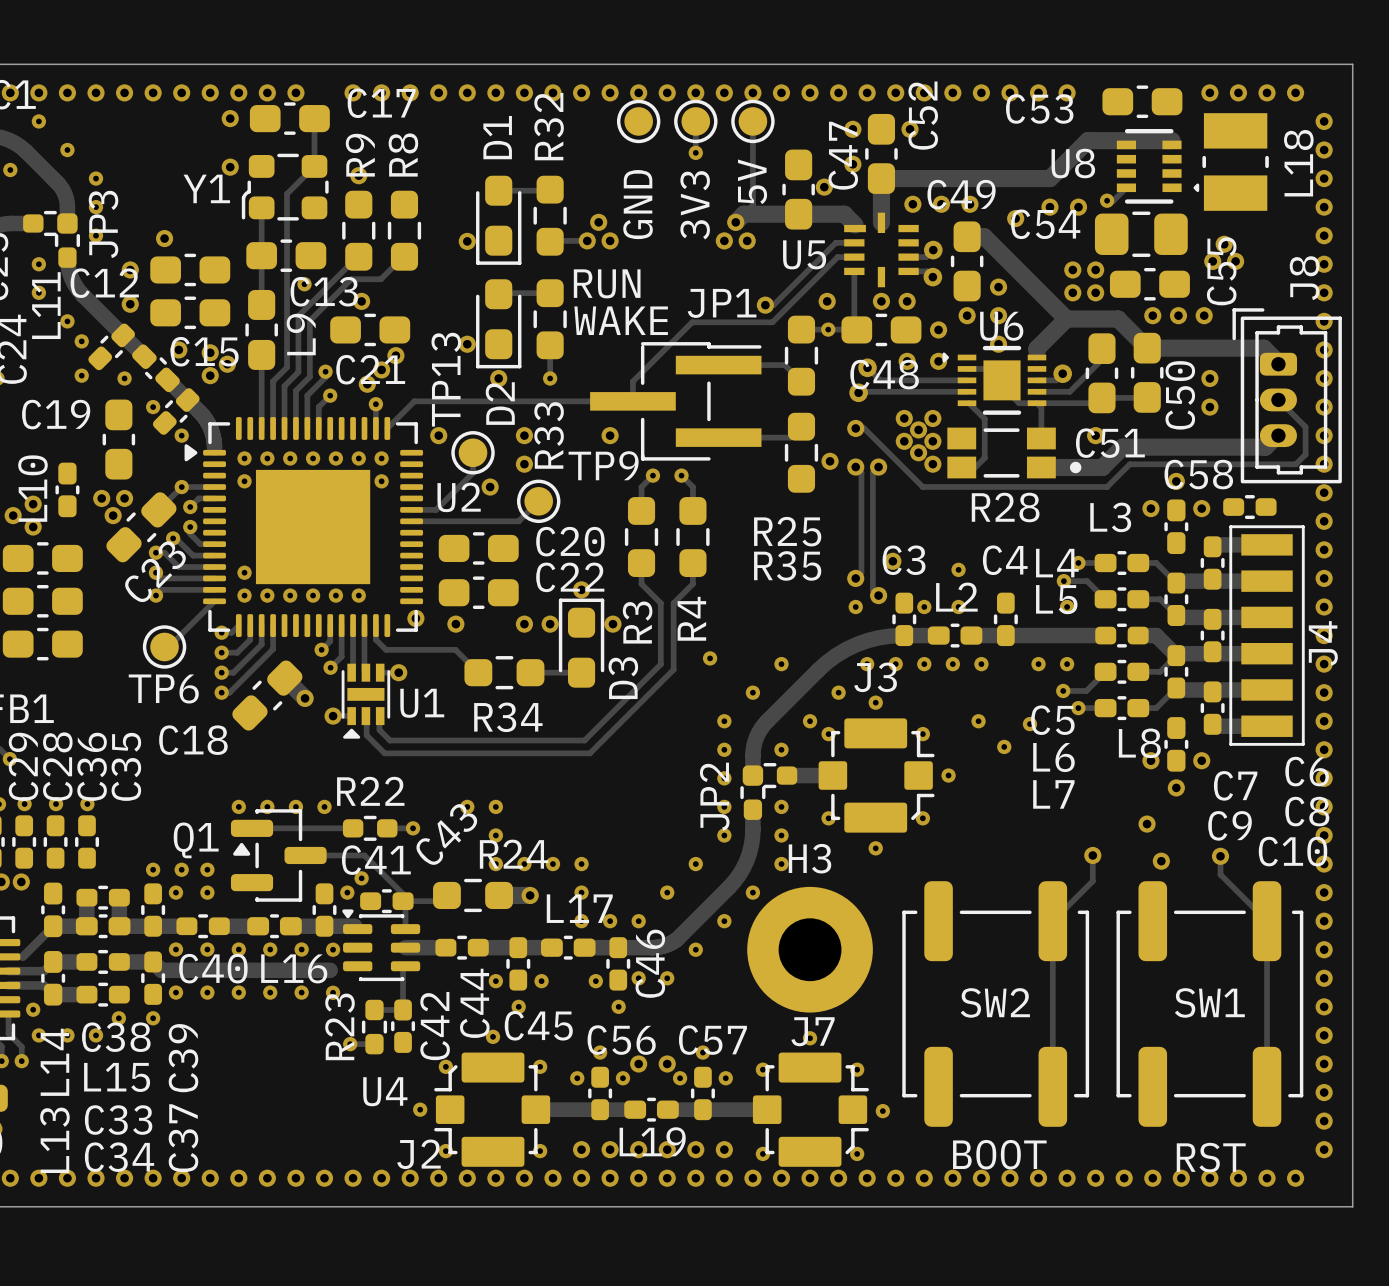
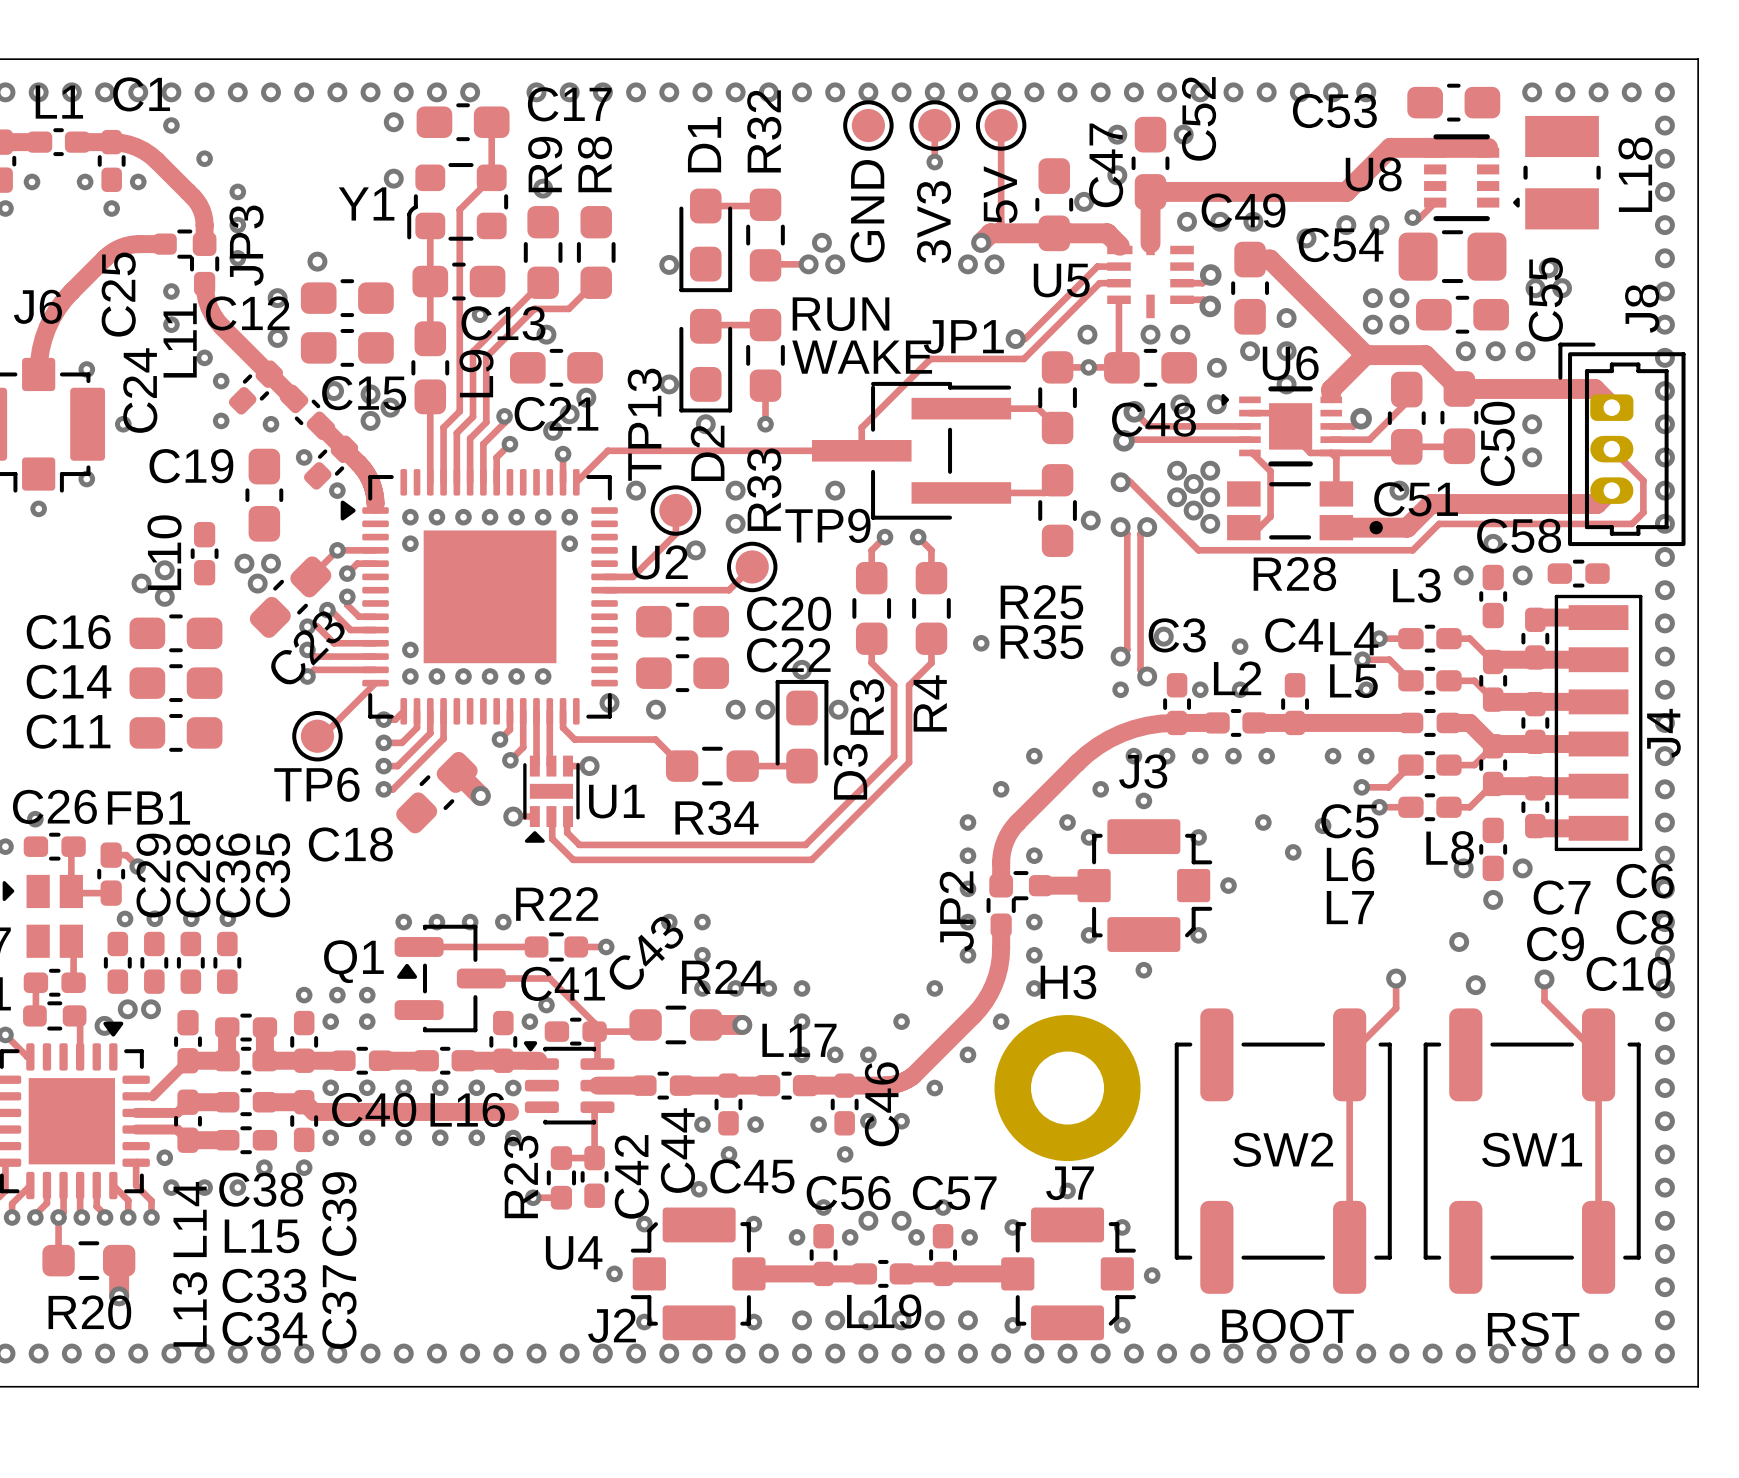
via: none -> (1664, 92)
via position: (710, 658) -> (981, 643)
via: none -> (1664, 1353)

